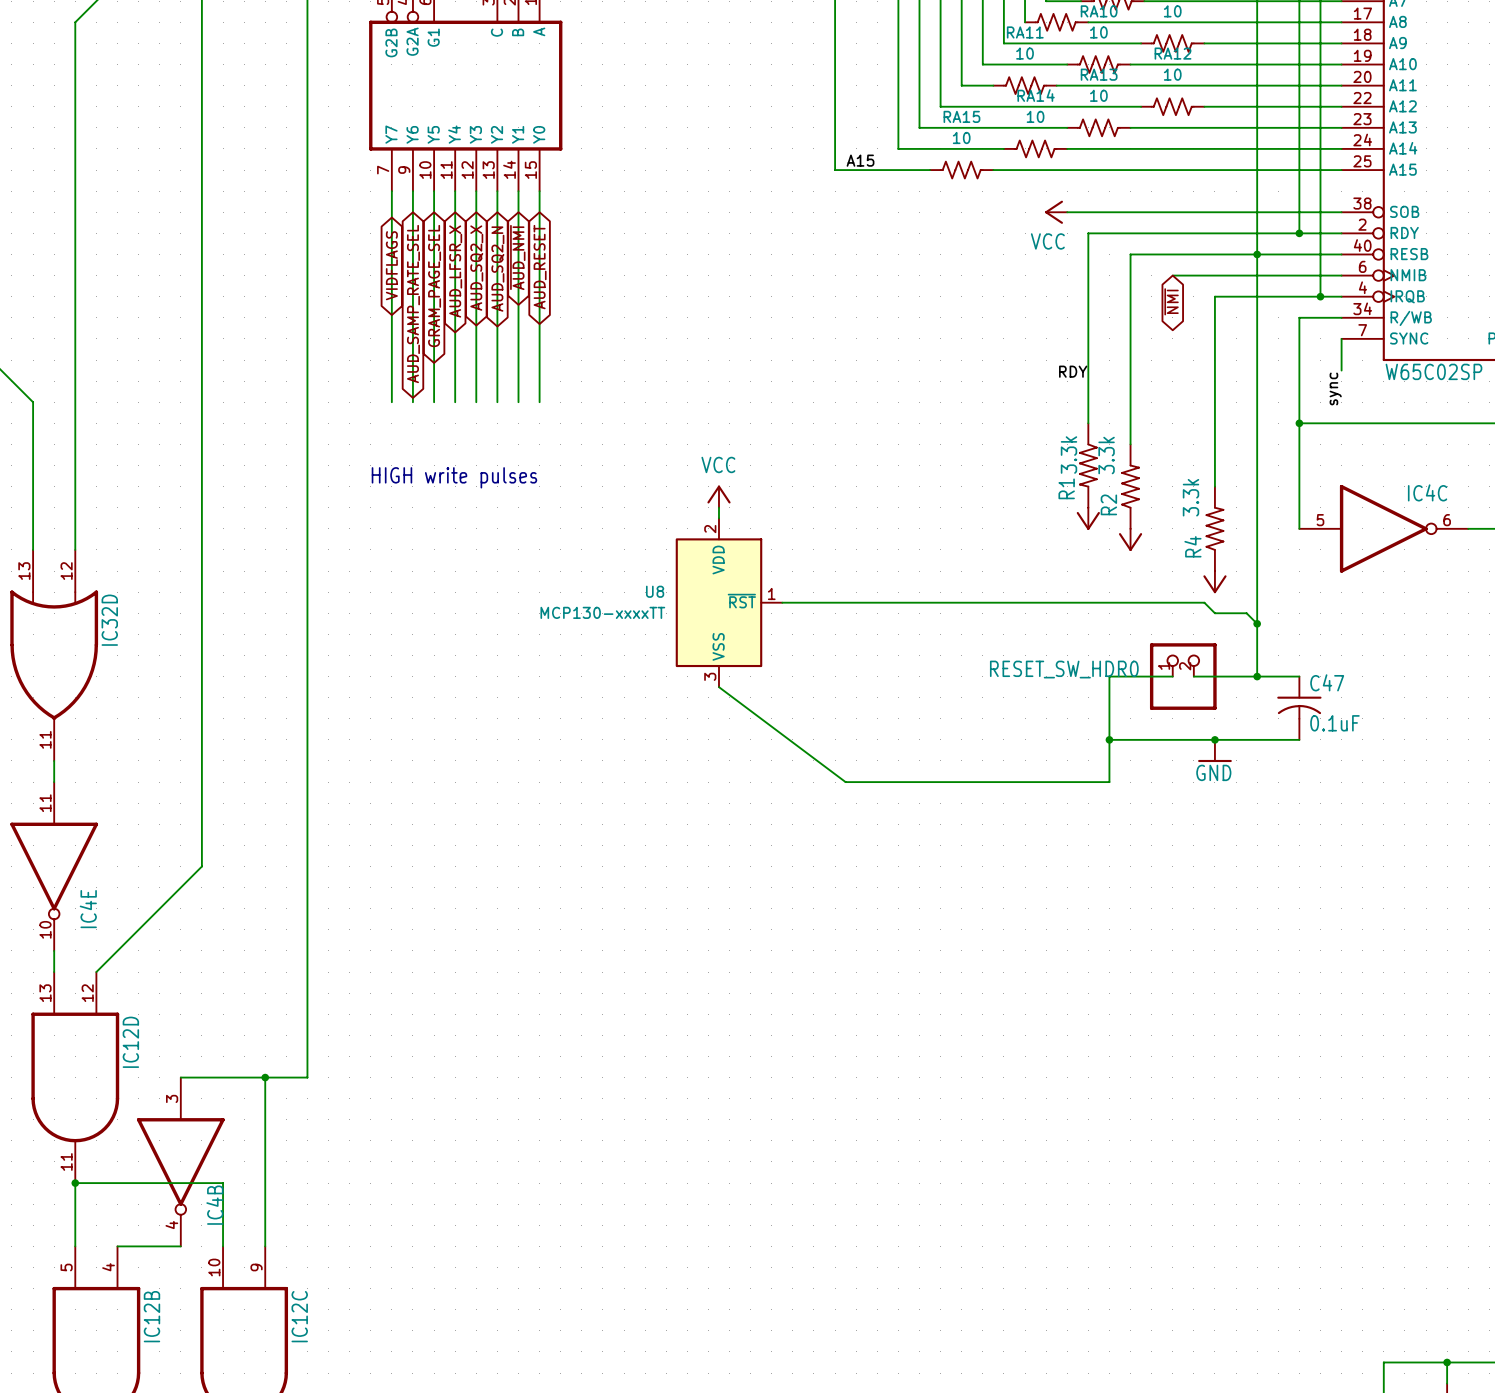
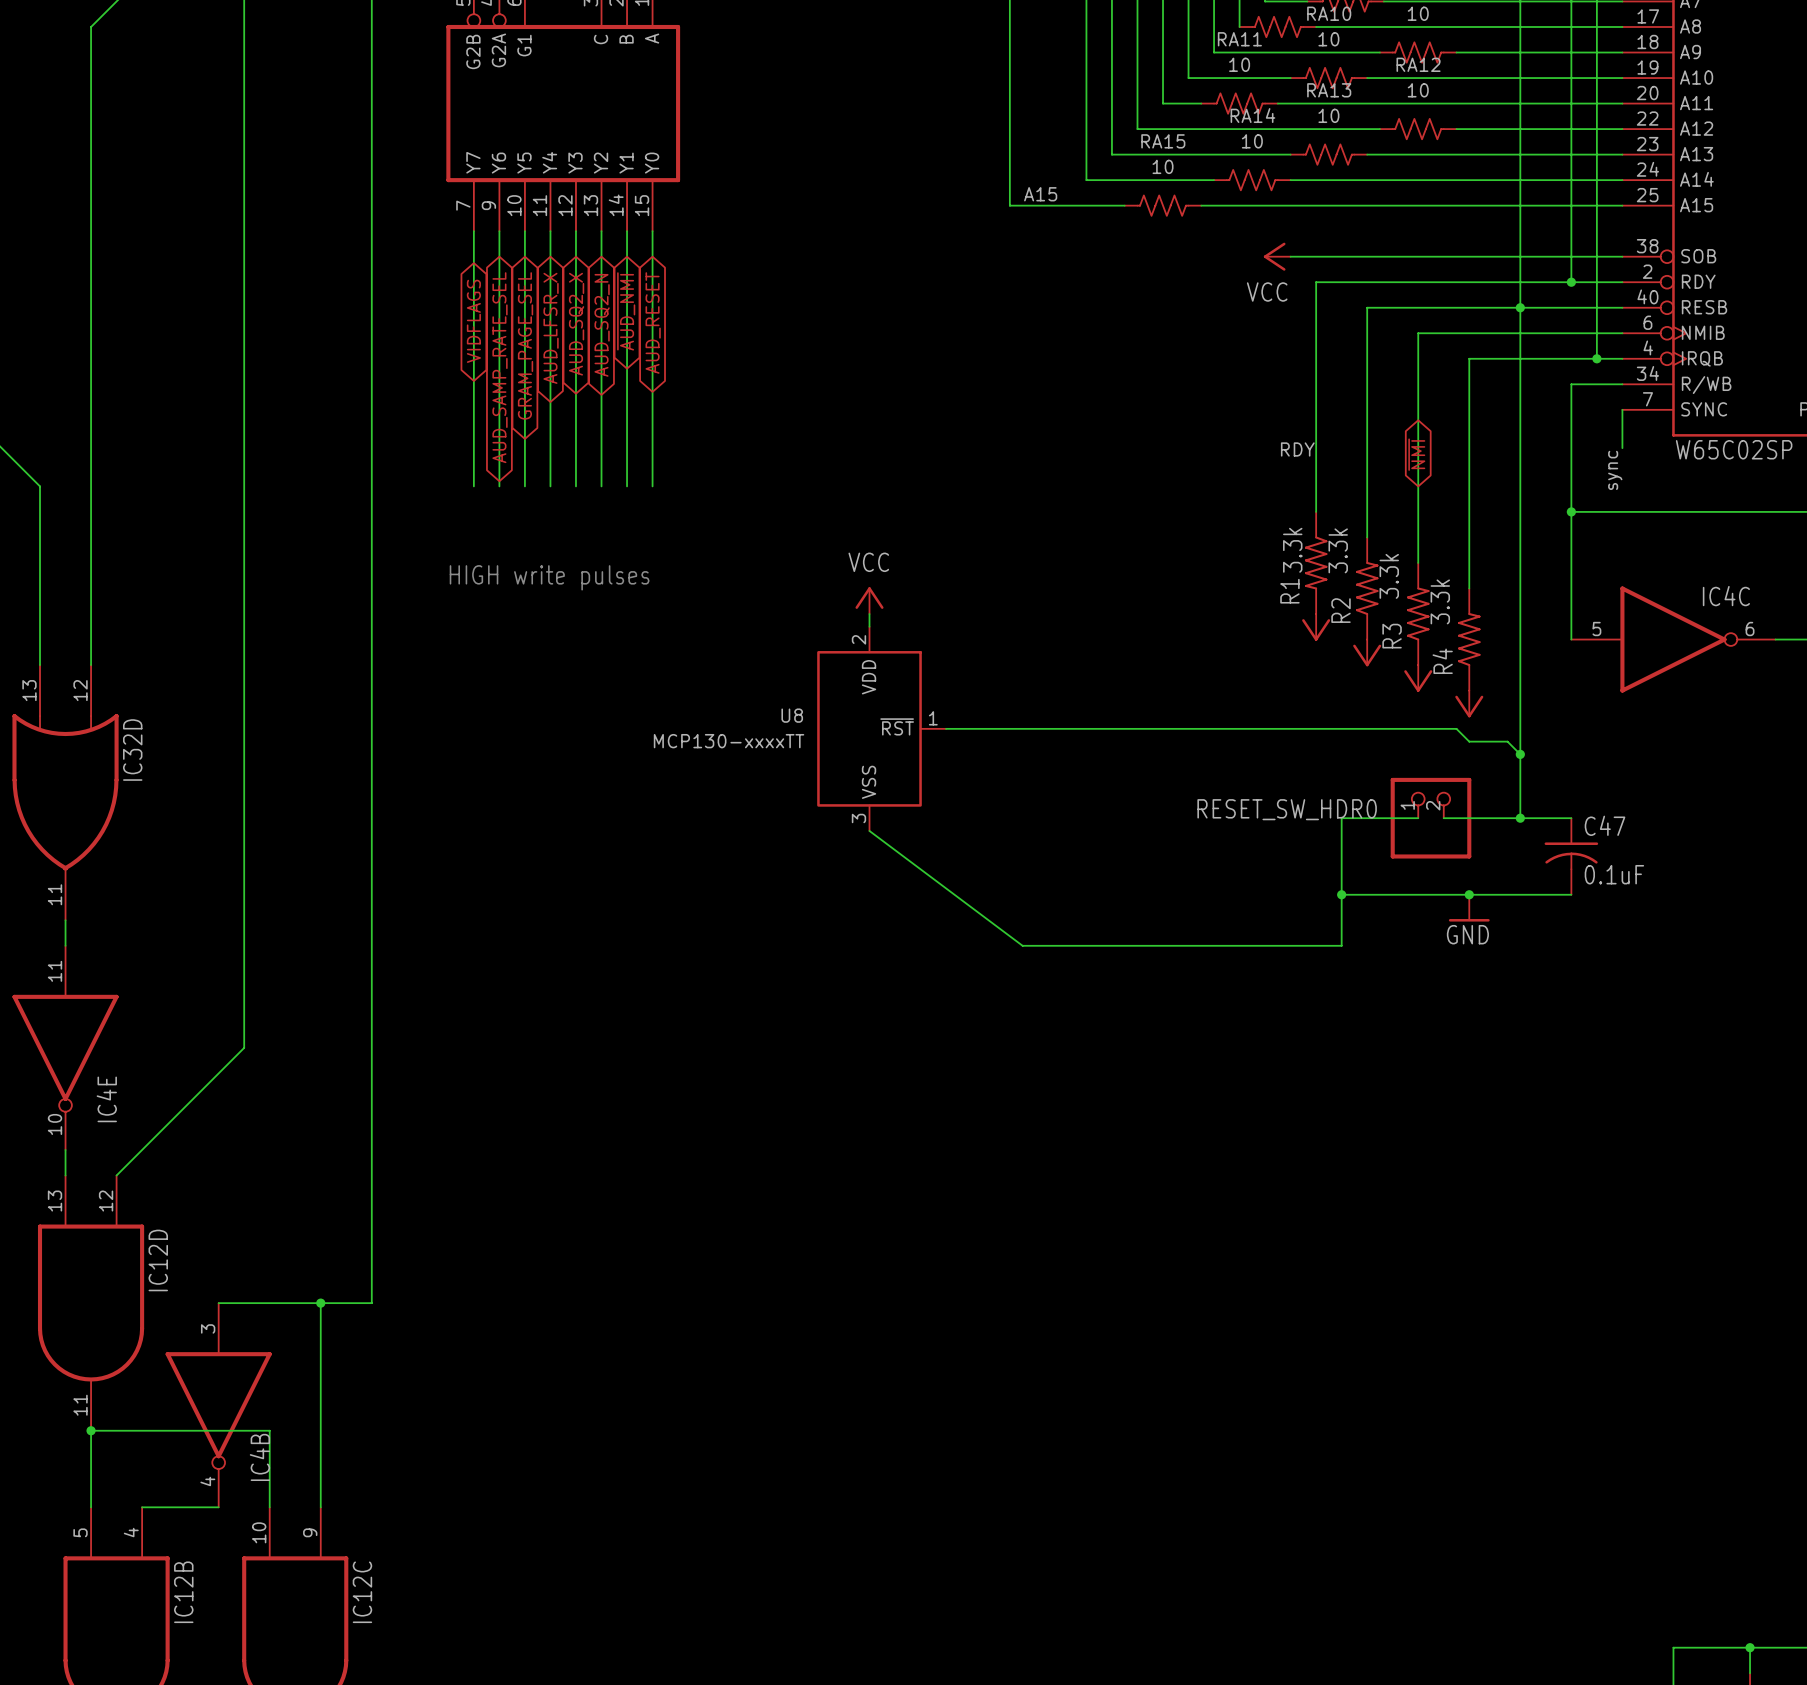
wire: none -> (1418, 333) (1418, 562)
global label rotation: 0° (1171, 301) -> 180° (1416, 454)
R3: none -> 3.3k (1418, 614)
power symbol: none -> (1418, 678)

